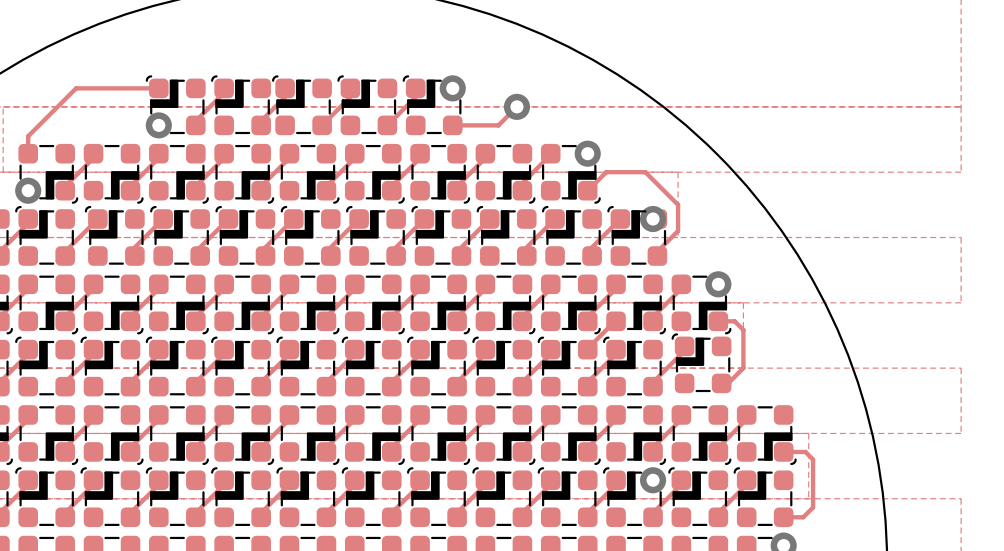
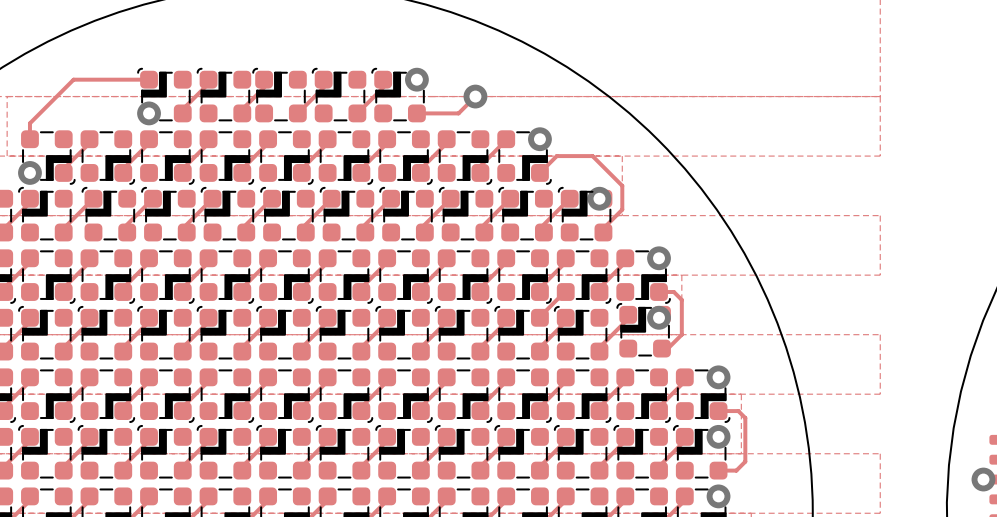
via: none -> (659, 317)
via: none -> (718, 377)
via: (653, 480) -> none
via: none -> (718, 436)

